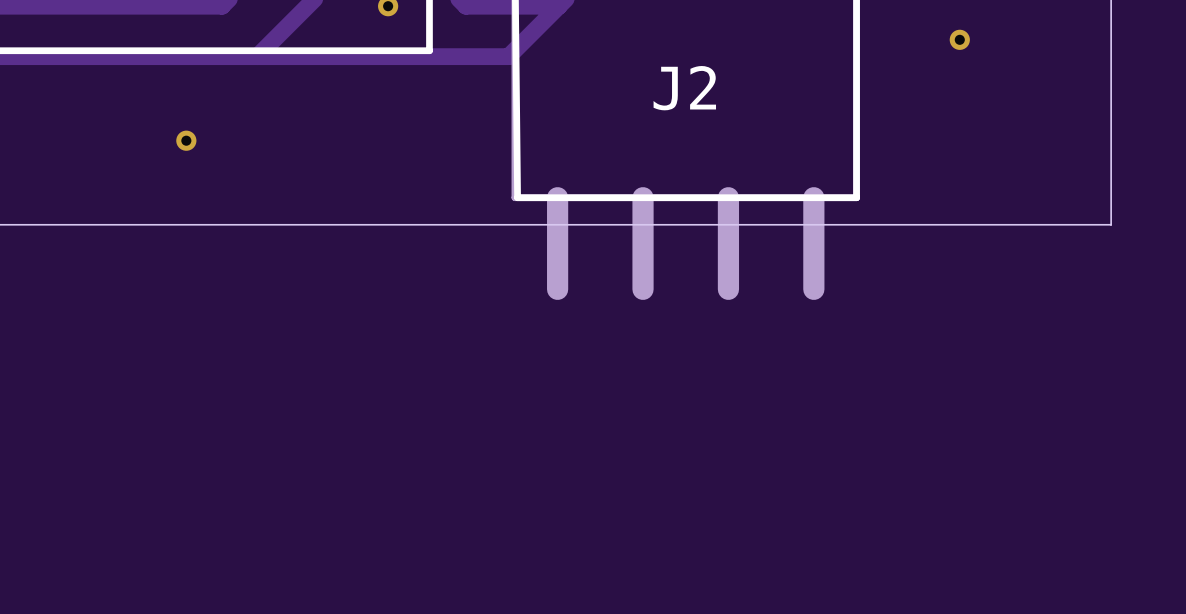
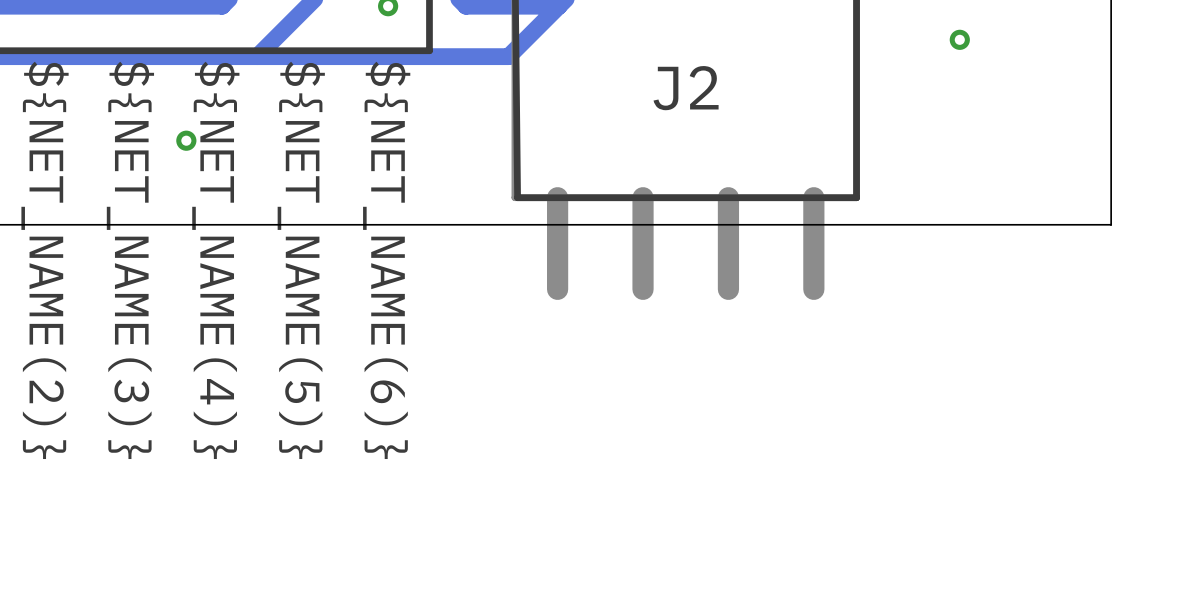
part text: none -> ${NET_NAME(2)} (45, 260)
part text: none -> ${NET_NAME(3)} (130, 260)
part text: none -> ${NET_NAME(4)} (215, 260)
part text: none -> ${NET_NAME(5)} (301, 260)
part text: none -> ${NET_NAME(6)} (386, 260)

